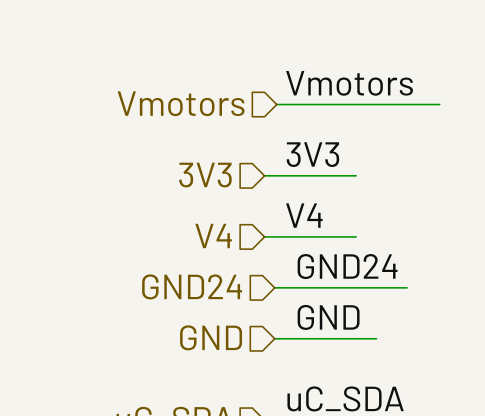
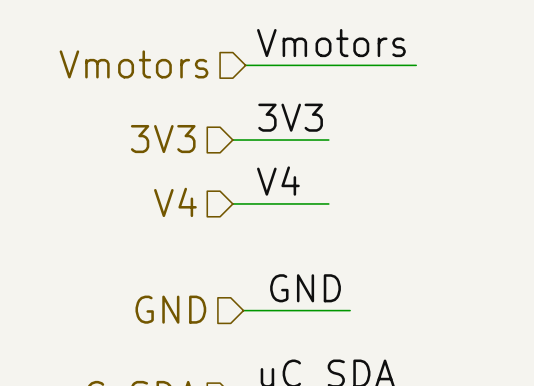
label: GND24 (347, 266) -> none
hierarchical label: GND24 (192, 286) -> none
wire: (274, 287) (407, 287) -> none

